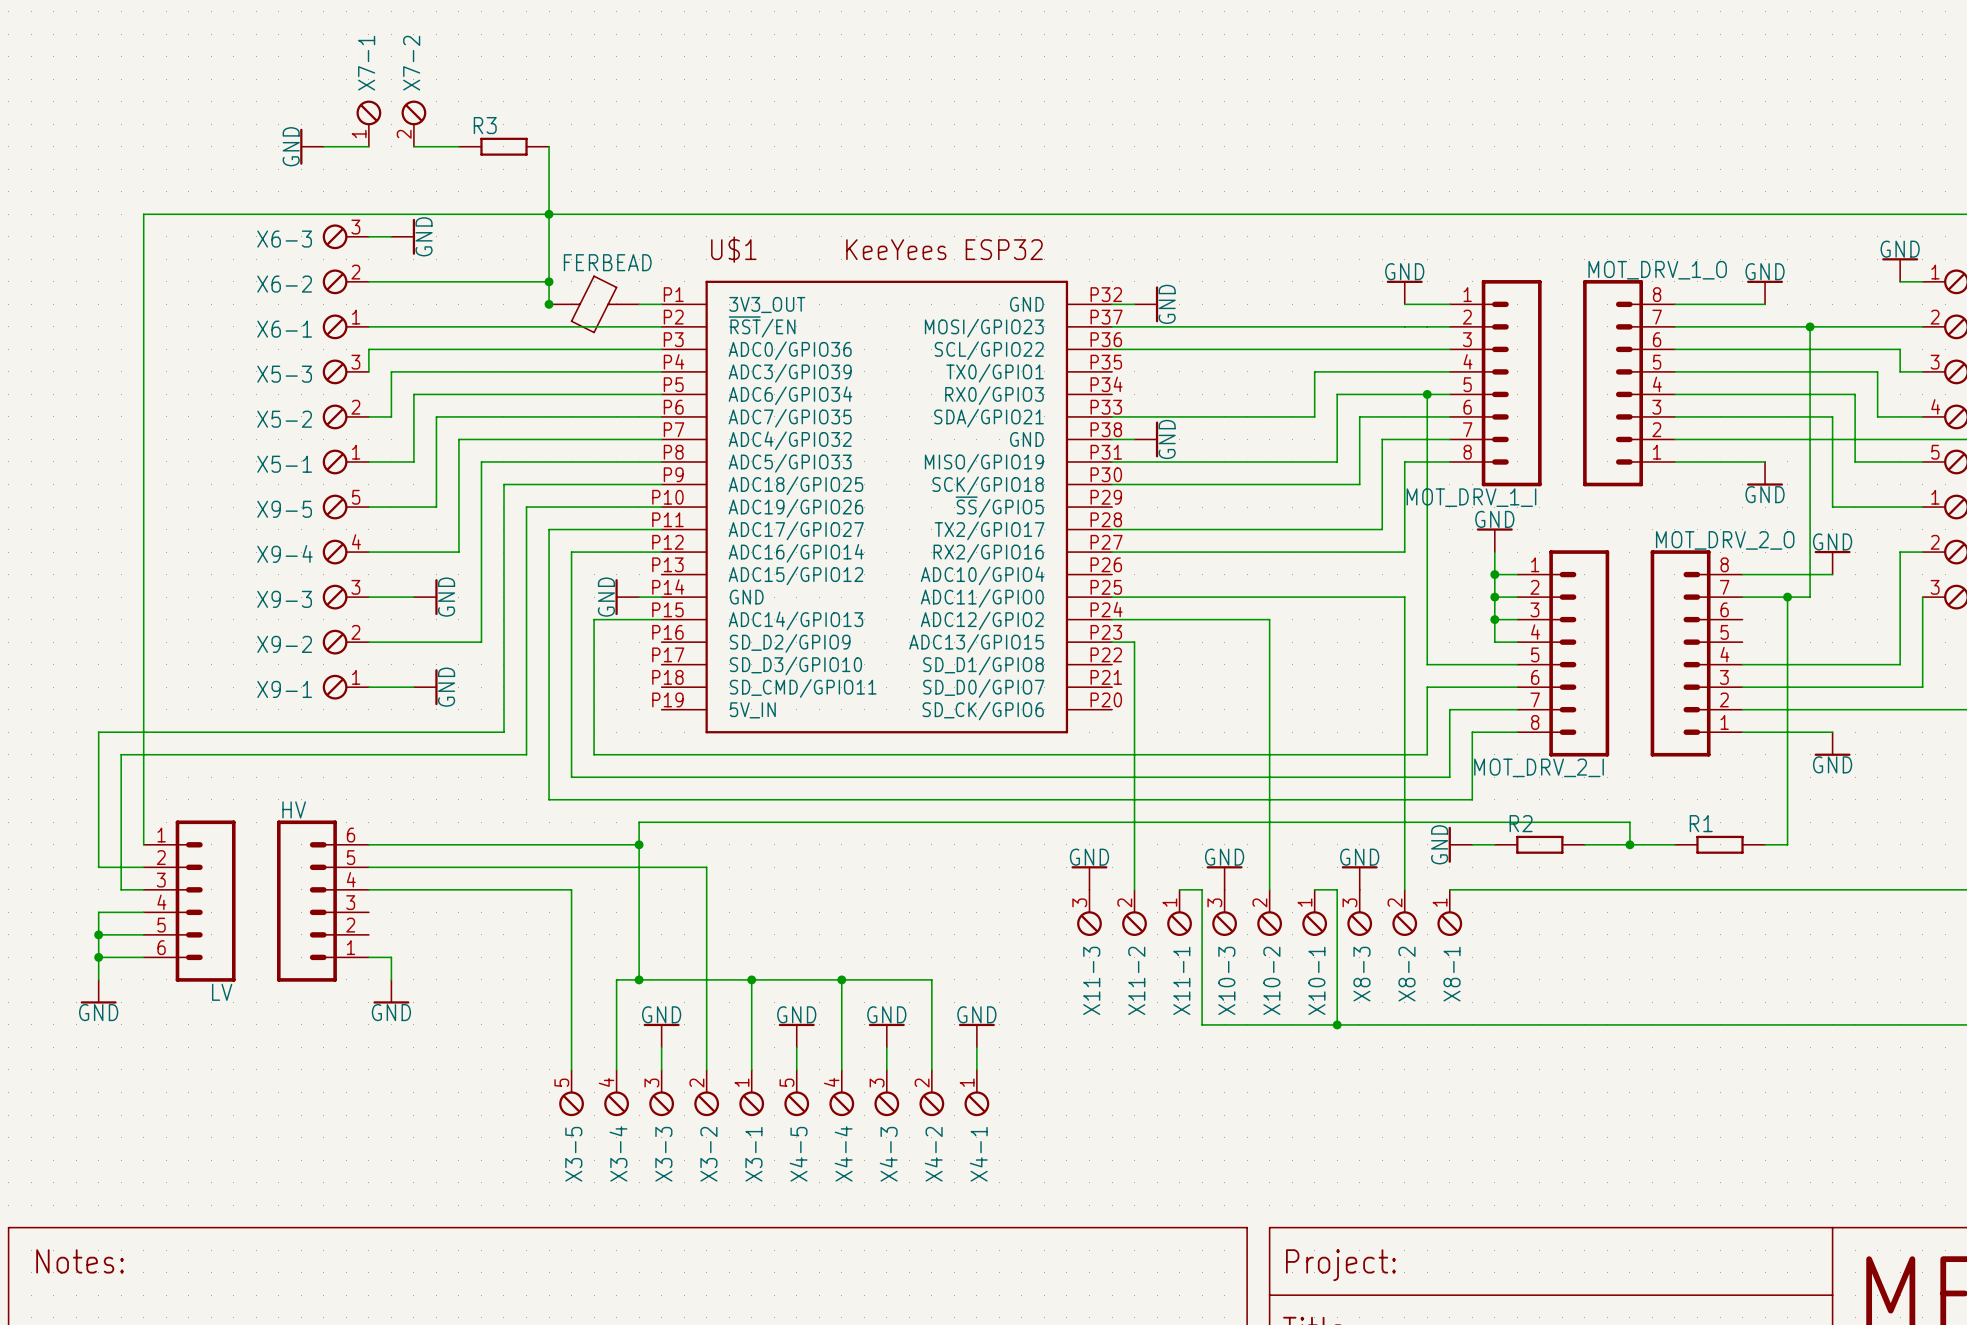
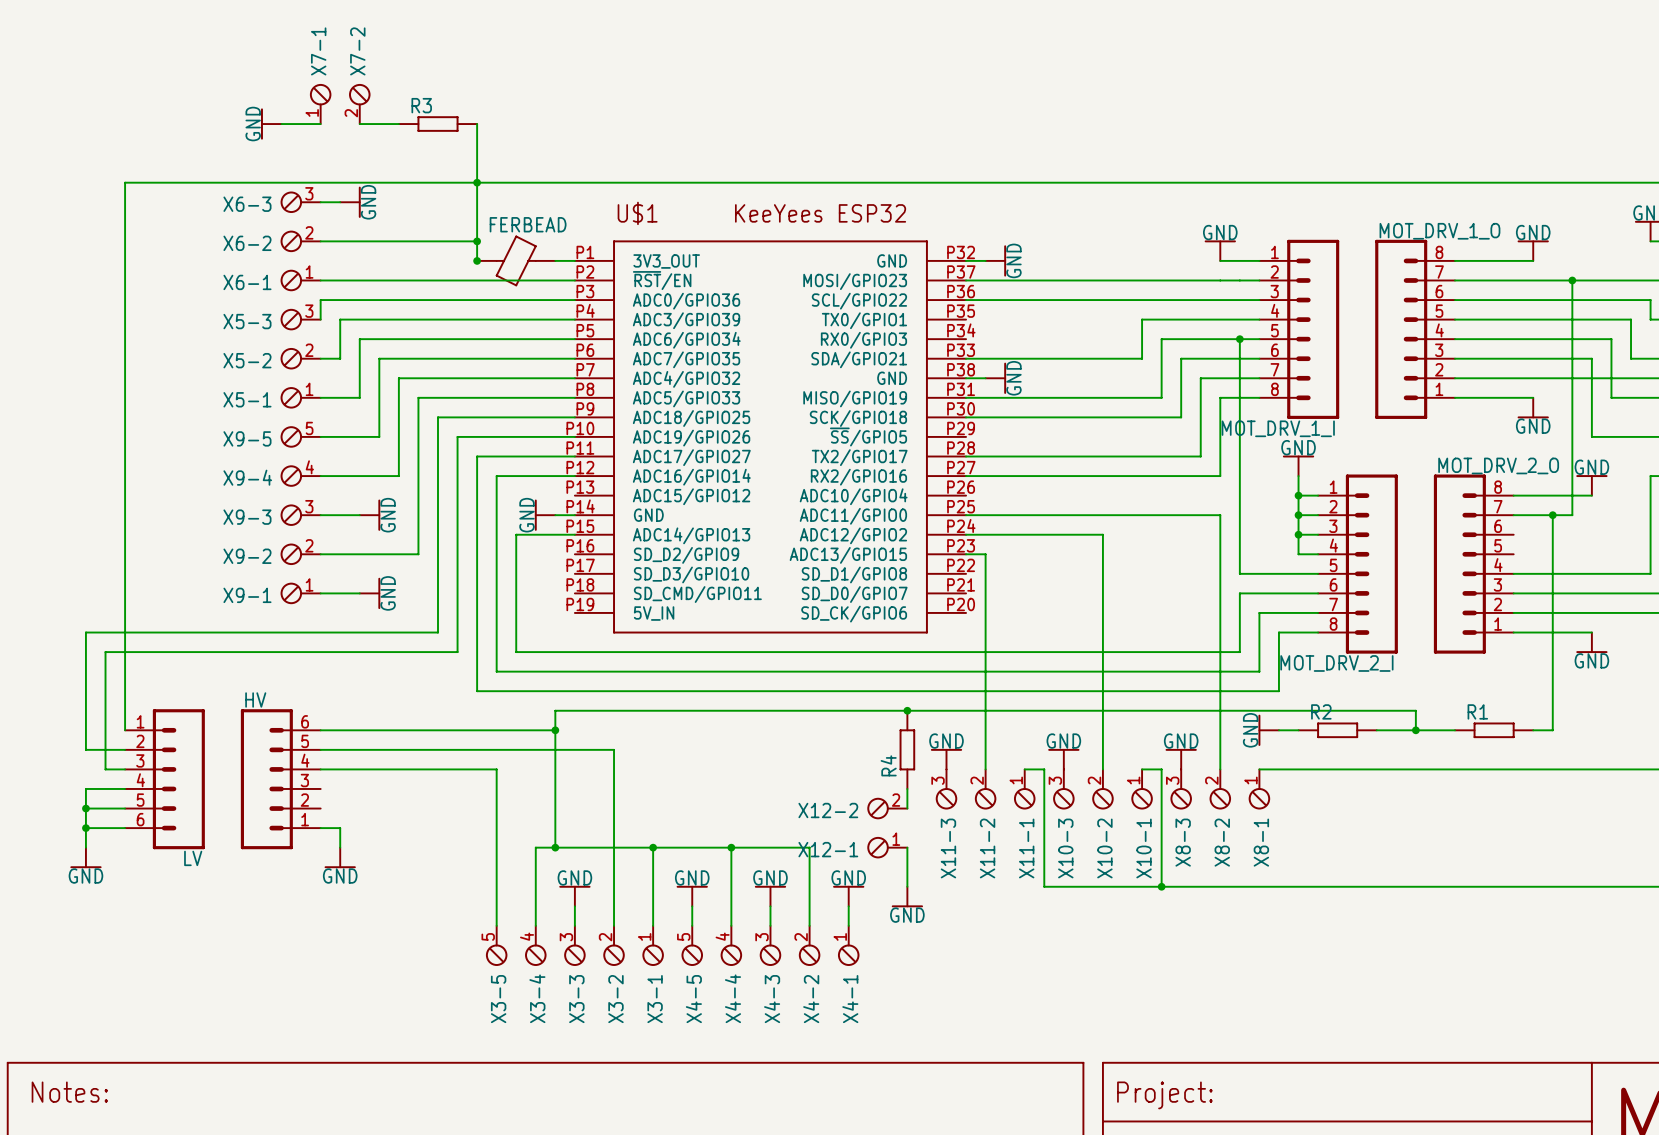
junction: none -> (907, 710)
R4: none -> (907, 749)
wire: none -> (907, 788) (907, 808)
X12-2: none -> (887, 808)
X12-1: none -> (887, 847)
wire: none -> (907, 847) (907, 886)
power symbol: none -> GND (907, 897)

